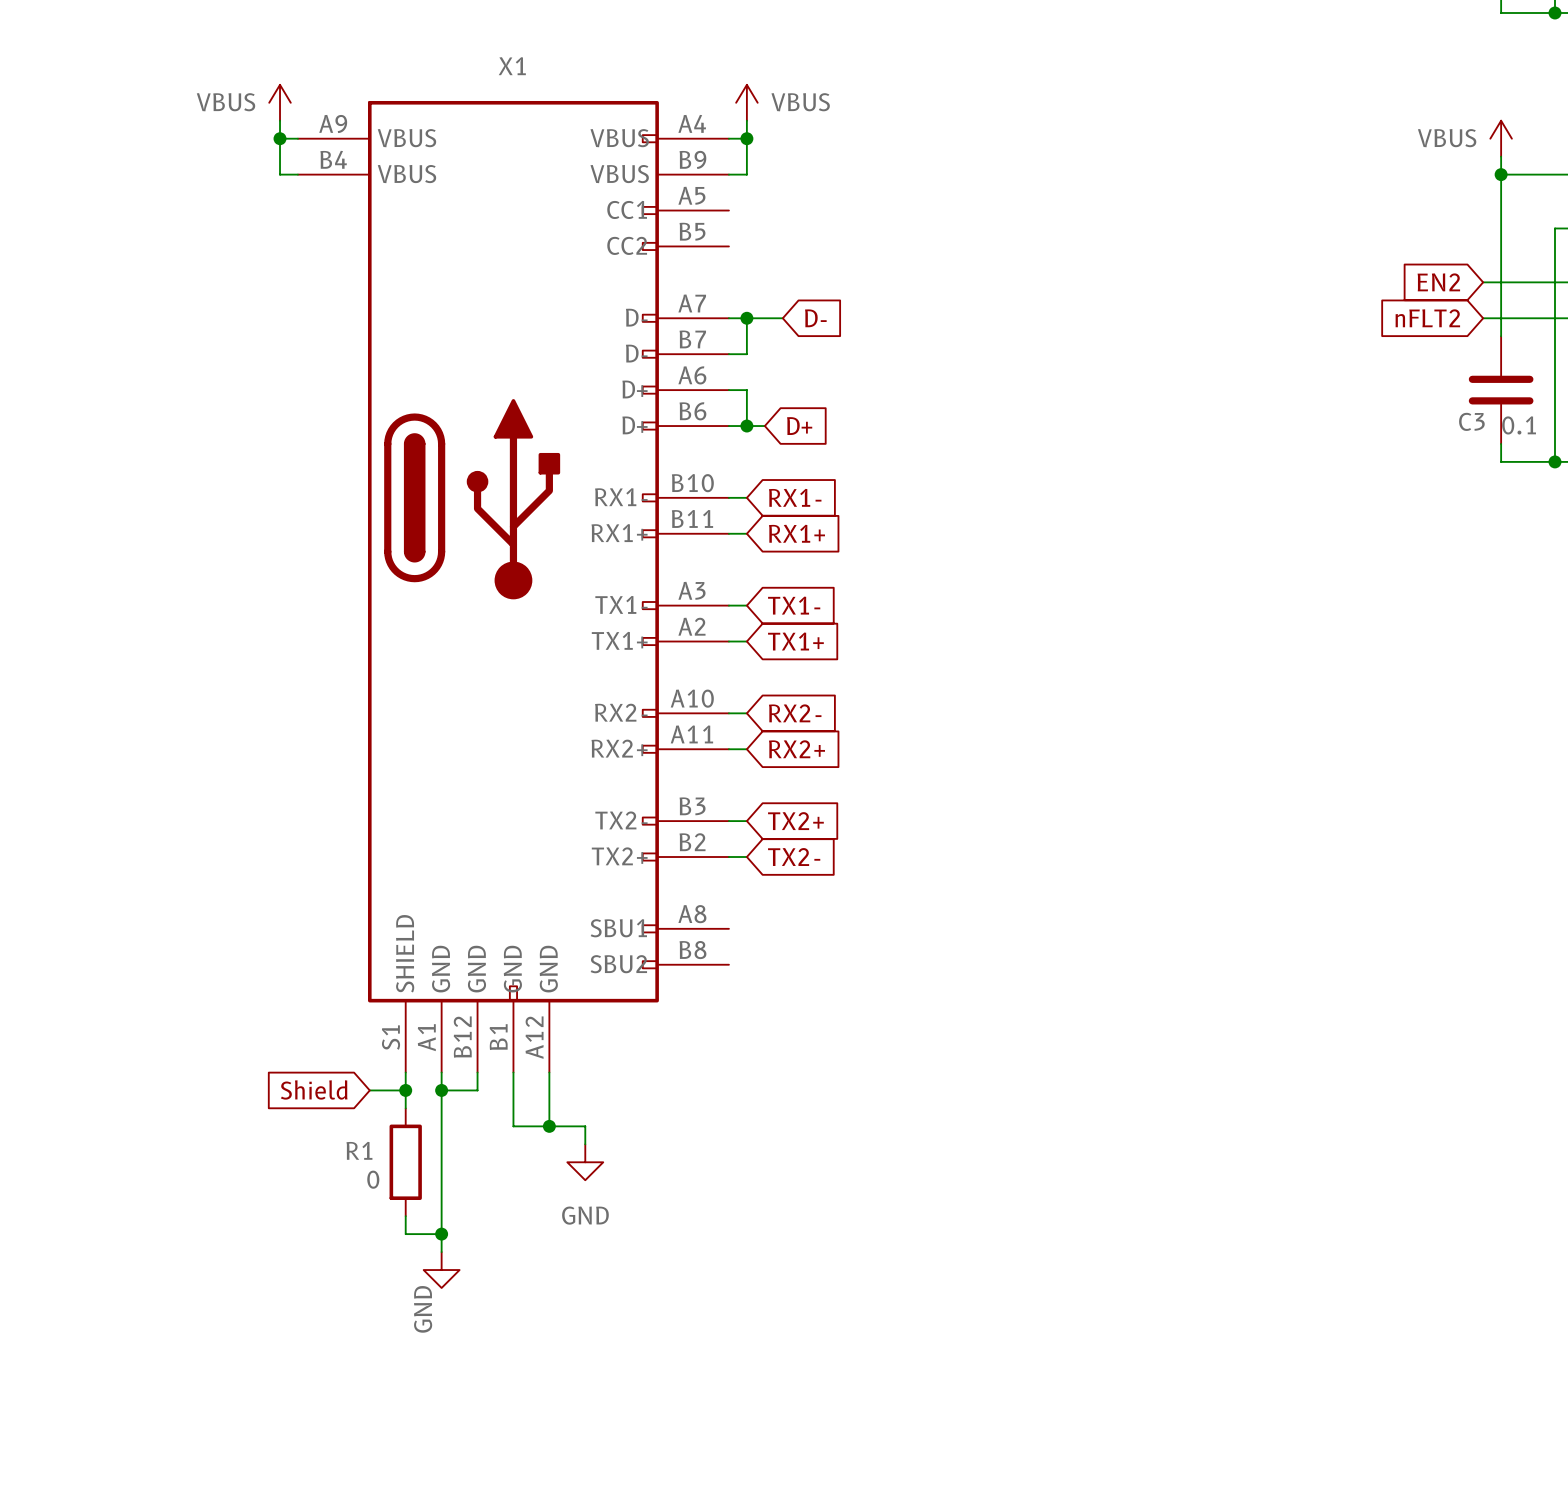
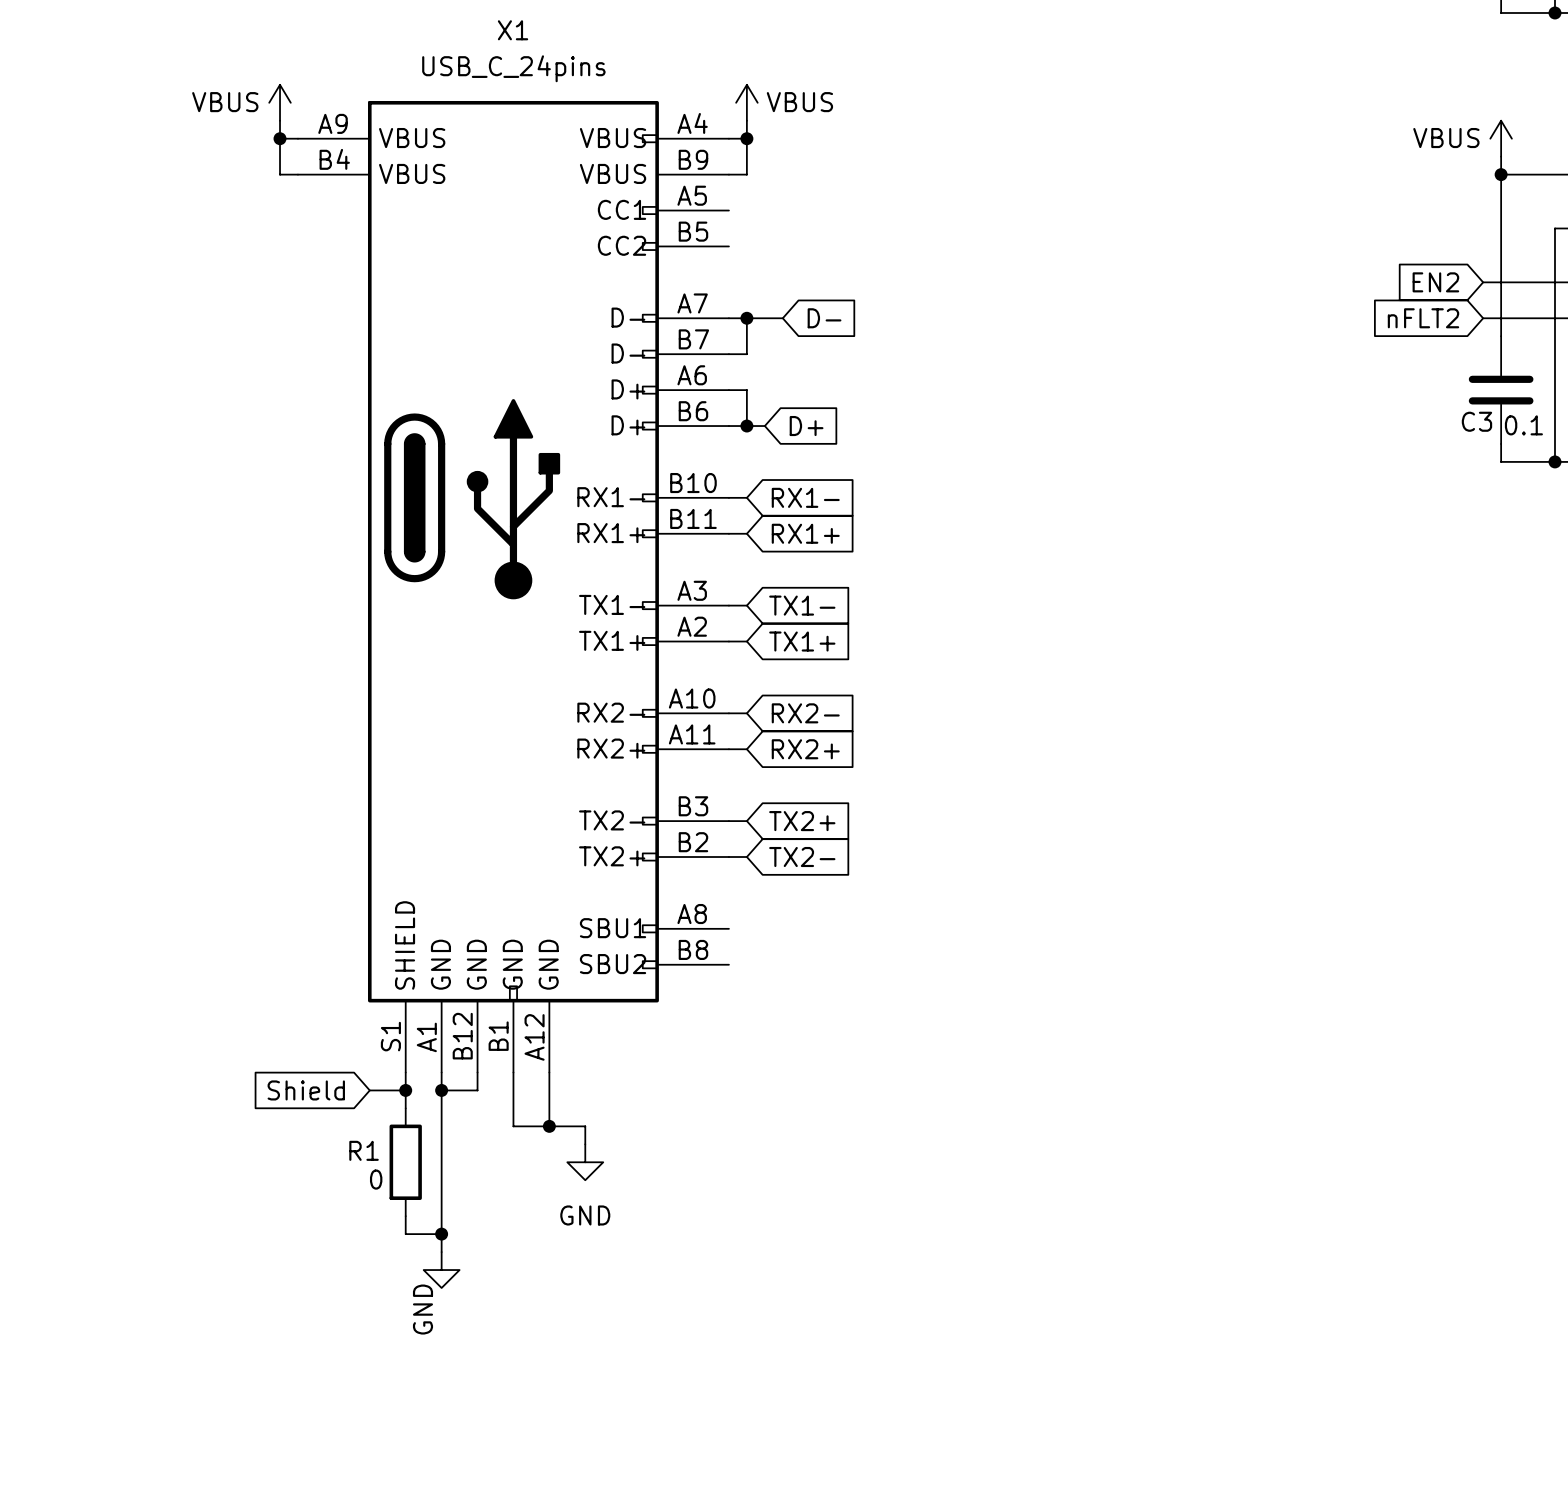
X1 name position: X1 (512, 66) -> X1 (513, 30)
X1 value: none -> USB_C_24pins (513, 68)

